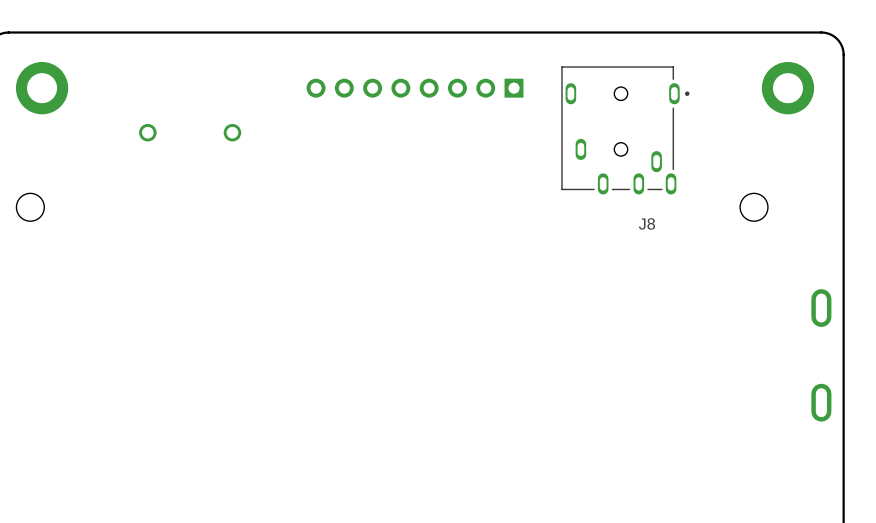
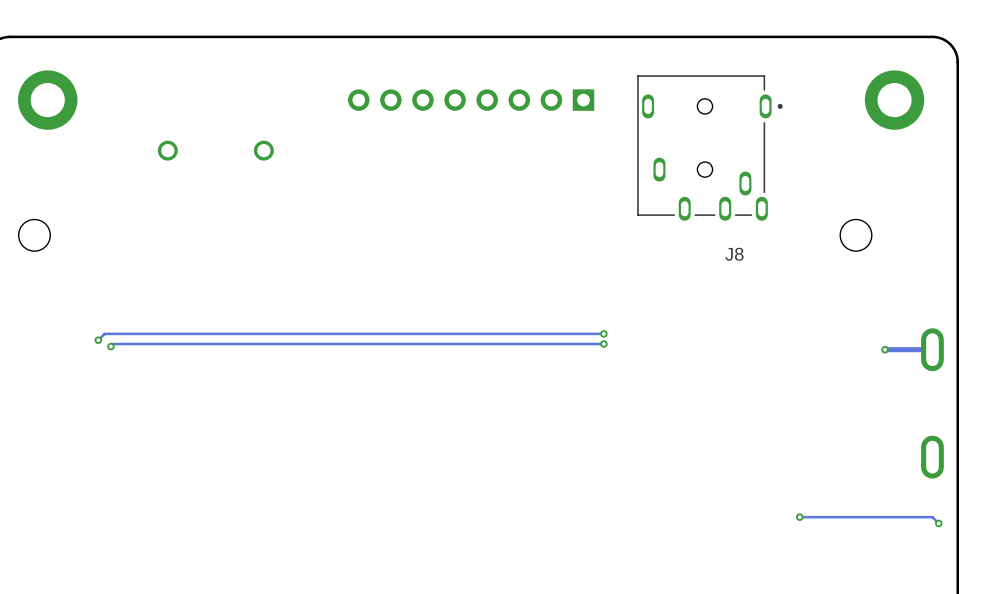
track: none -> (603, 333) (104, 333) (98, 340)
via: none -> (603, 333)
via: none -> (98, 340)
track: none -> (603, 344) (113, 344) (110, 346)
via: none -> (603, 344)
via: none -> (110, 346)
via: none -> (885, 349)
track: none -> (932, 349) (885, 349)
track: none -> (799, 517) (932, 517) (938, 523)
via: none -> (799, 517)
via: none -> (938, 523)

